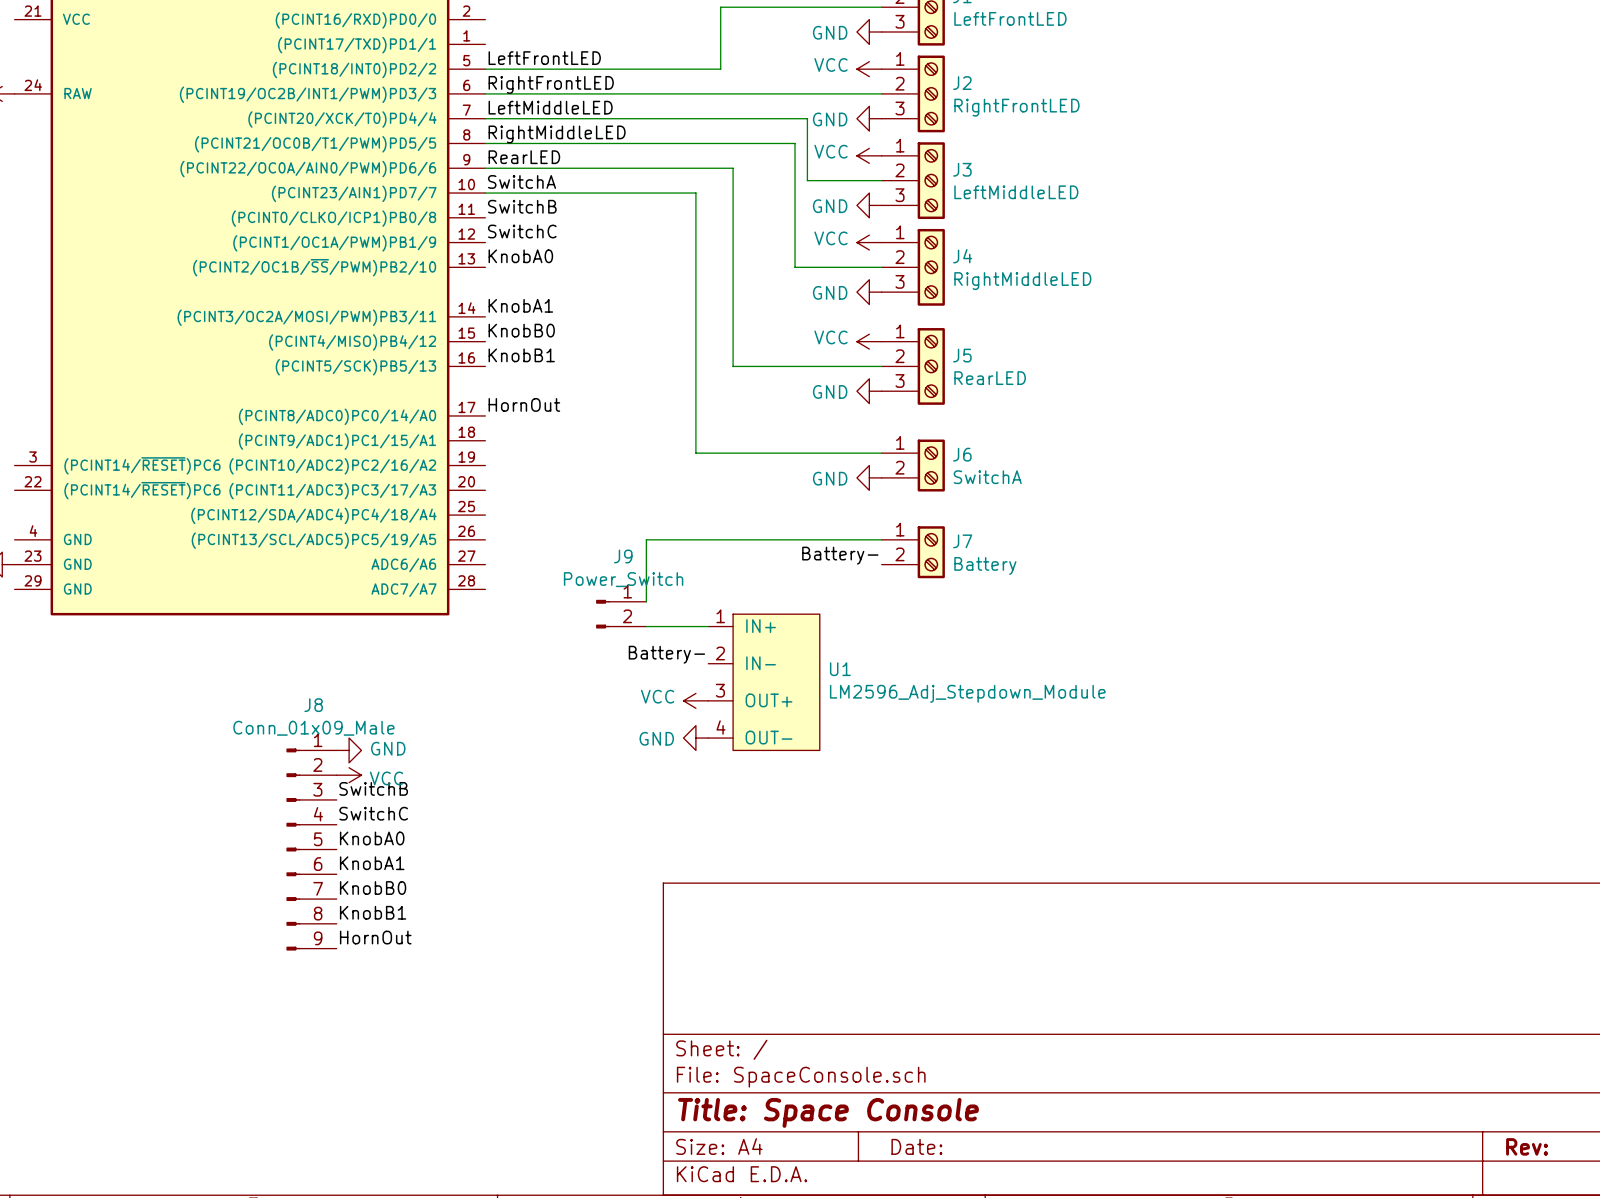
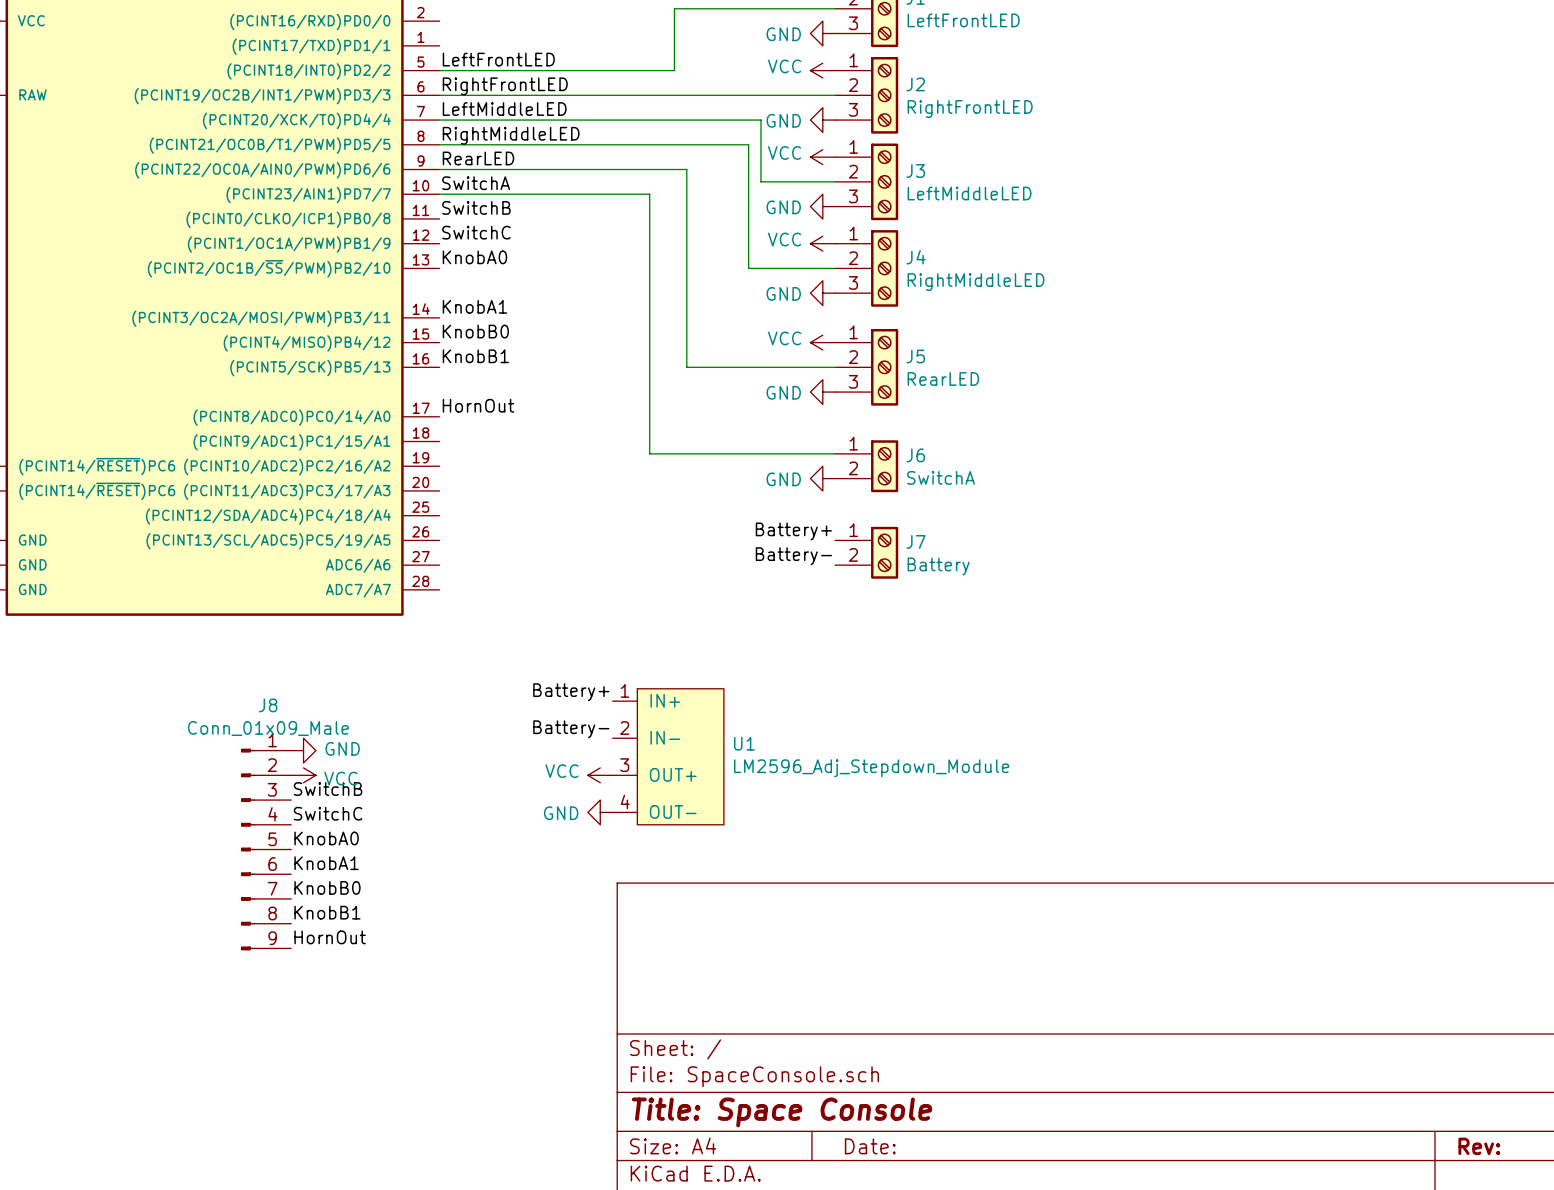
label: none -> Battery+ (793, 531)
wire: (881, 539) (646, 539) (646, 601) -> none
J9: Power_Switch (621, 614) -> none
wire: (646, 626) (708, 626) -> none
label position: Battery- (666, 654) -> Battery- (571, 729)
U1 position: (764, 682) -> (668, 756)
label: none -> Battery+ (571, 692)
power symbol position: VCC (695, 700) -> VCC (600, 775)
power symbol position: GND (695, 738) -> GND (600, 812)

